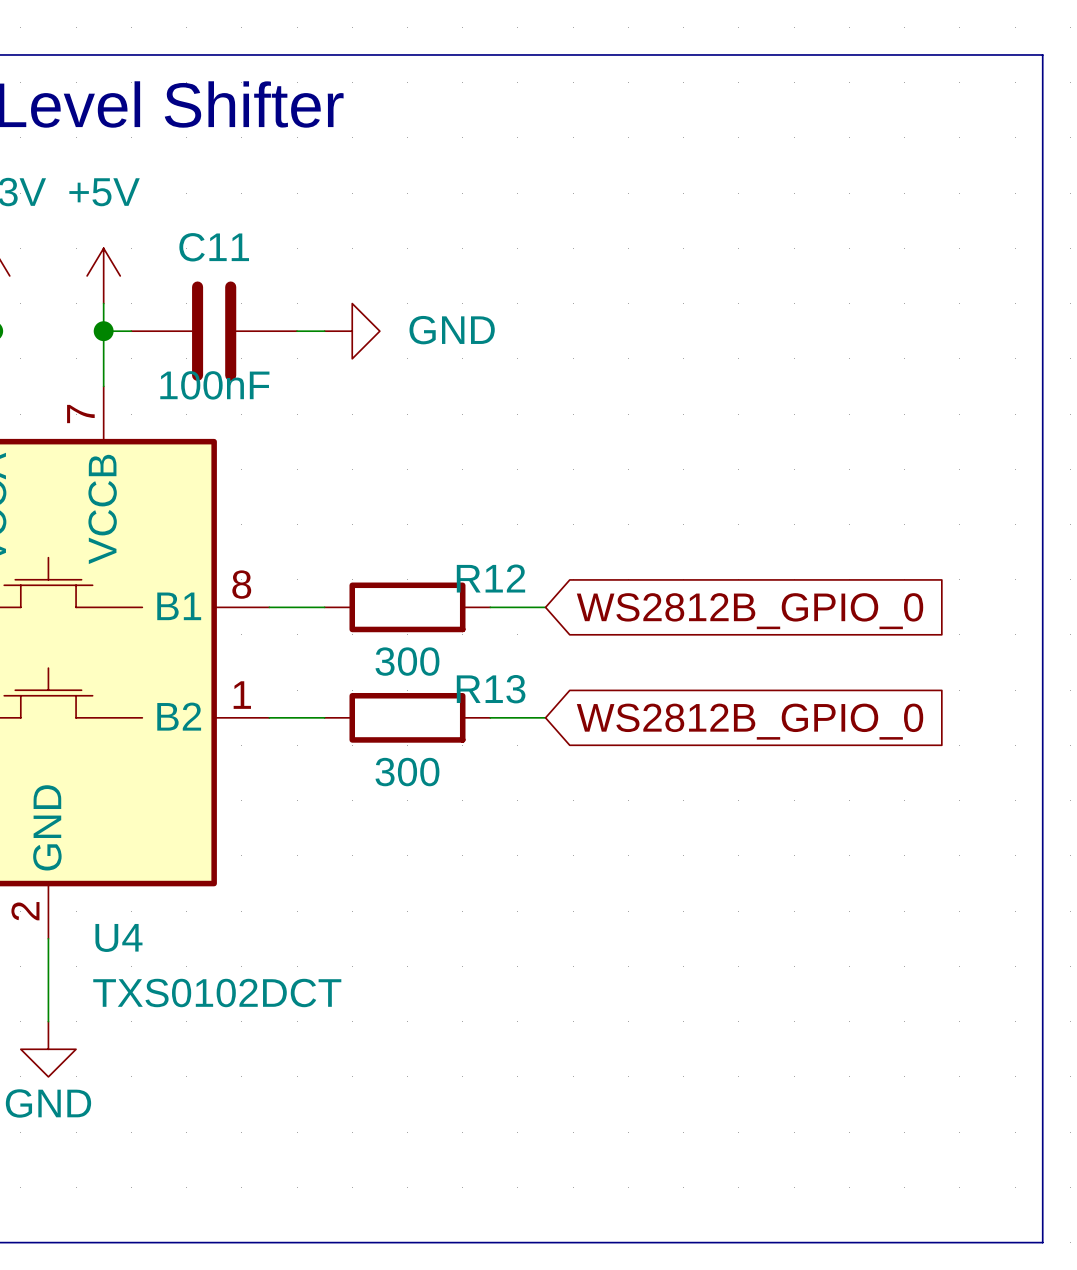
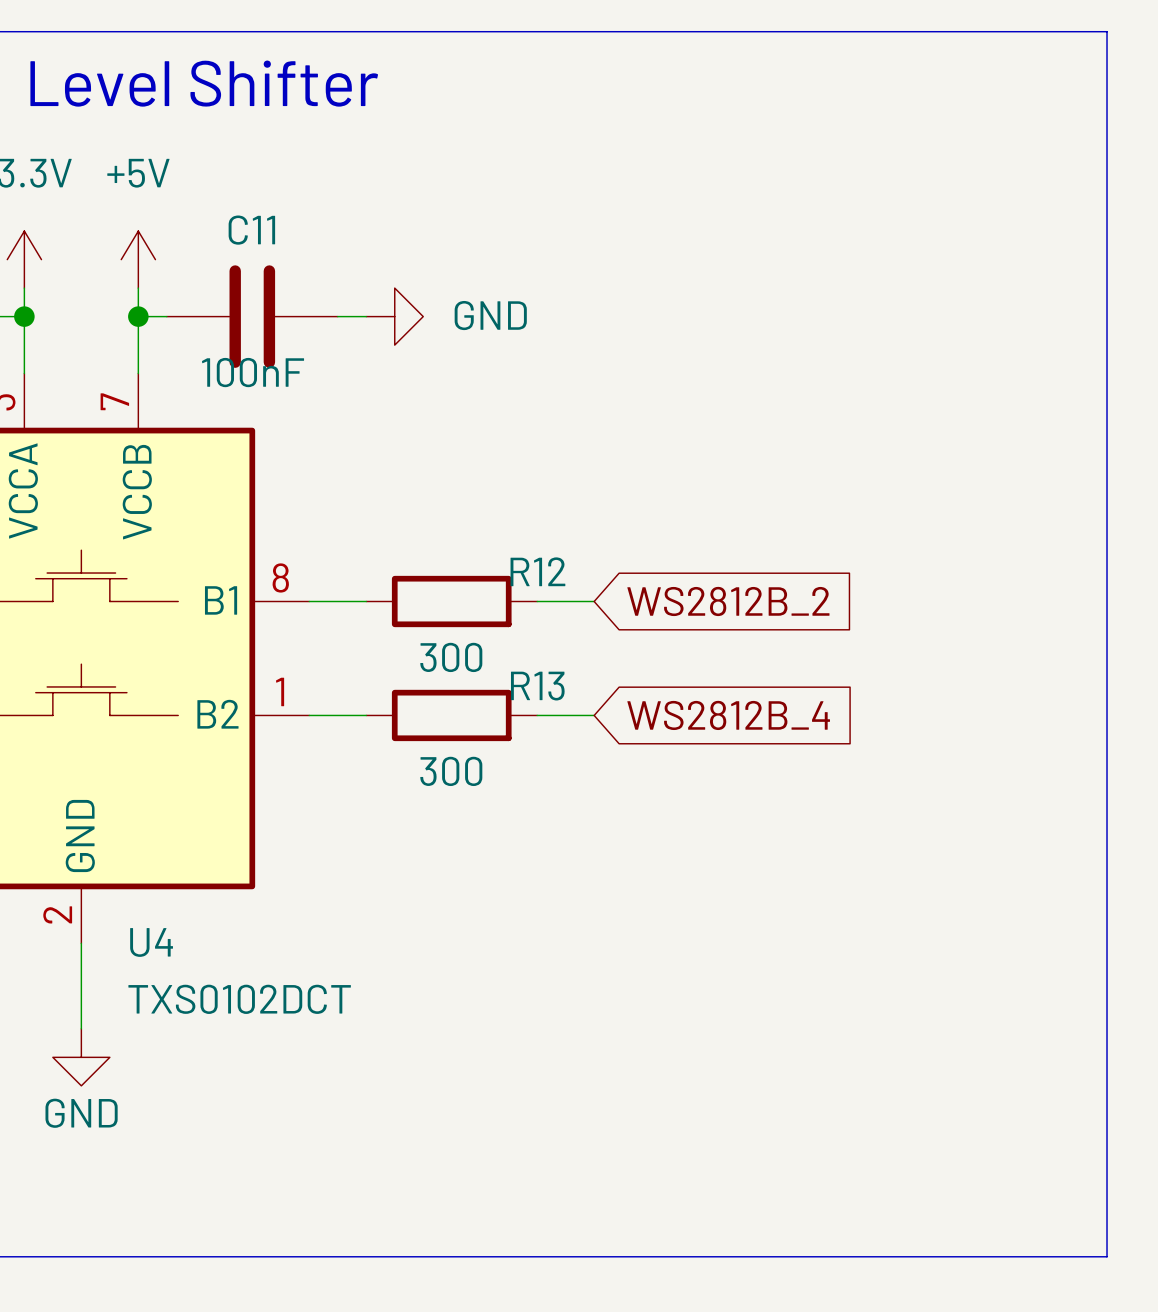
global label: WS2812B_GPIO_0 (750, 611) -> WS2812B_2 (728, 601)
global label: WS2812B_GPIO_0 (750, 721) -> WS2812B_4 (728, 715)

